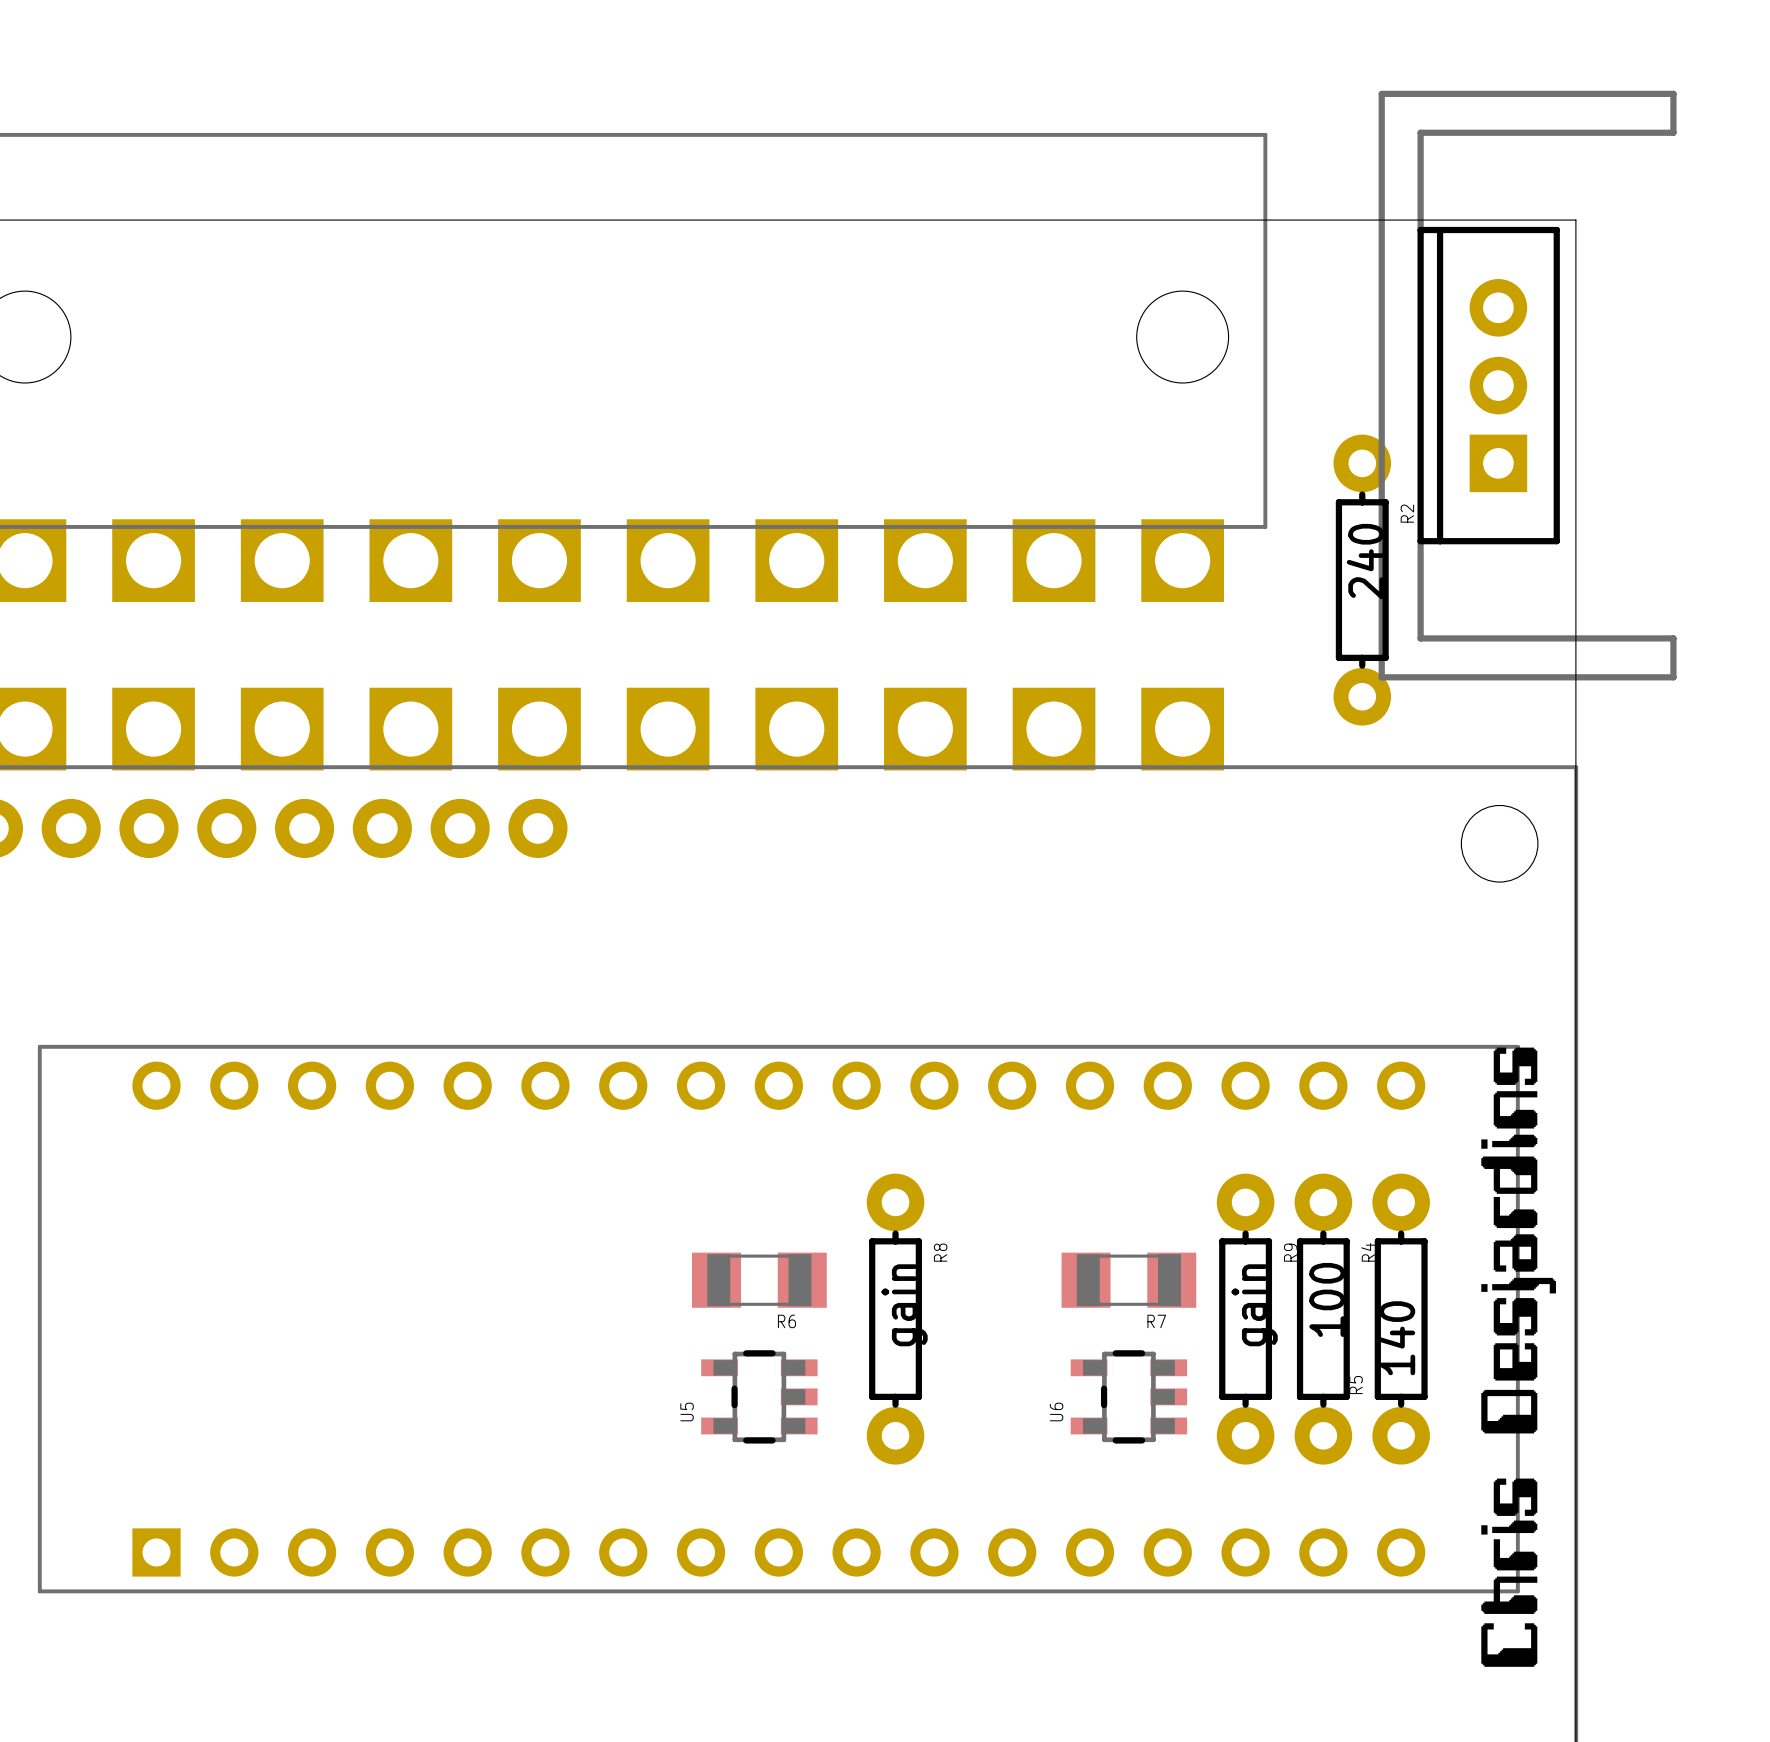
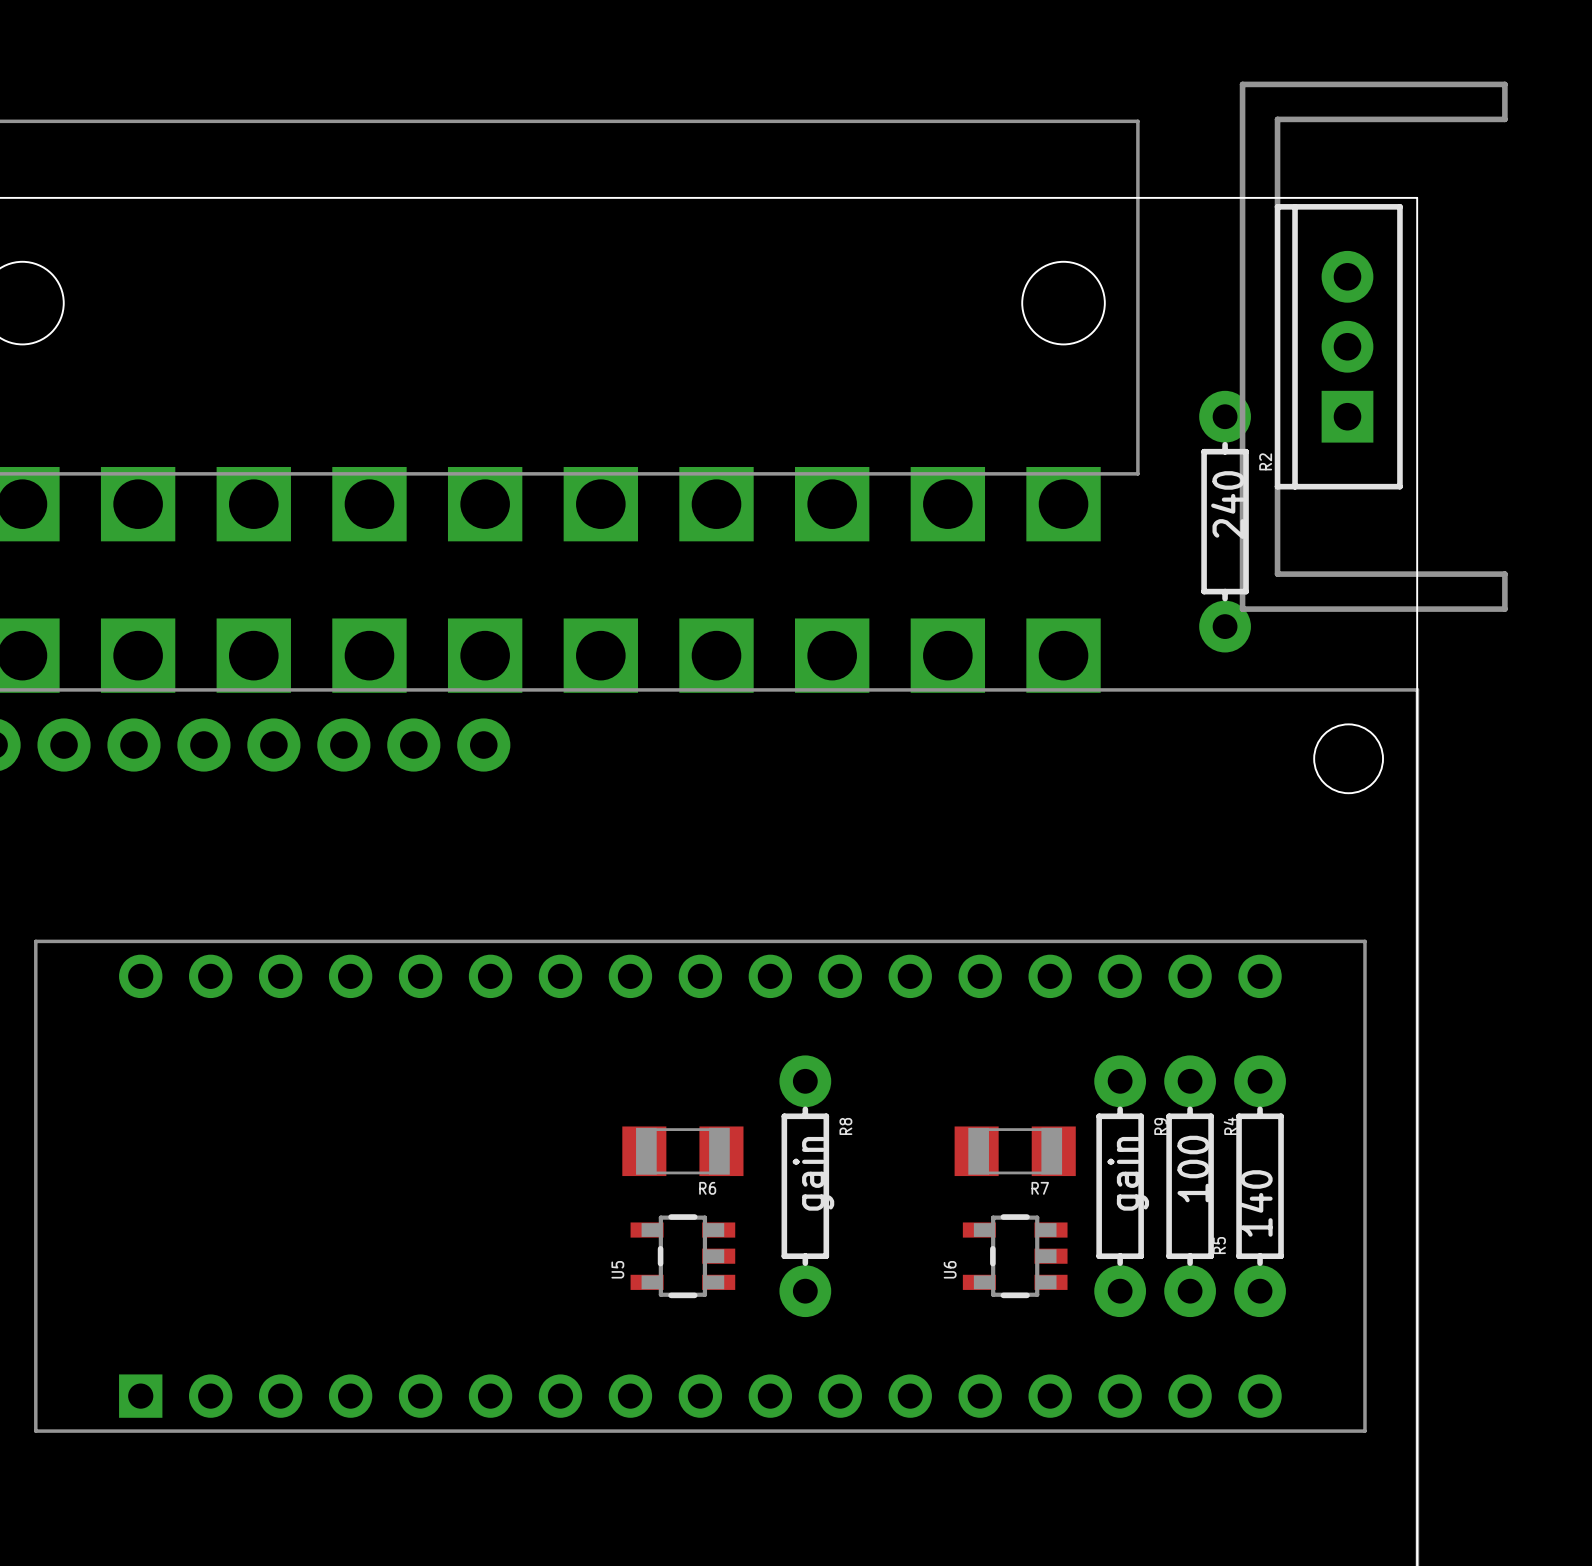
drawing: [1481, 1047, 1556, 1667] -> none

